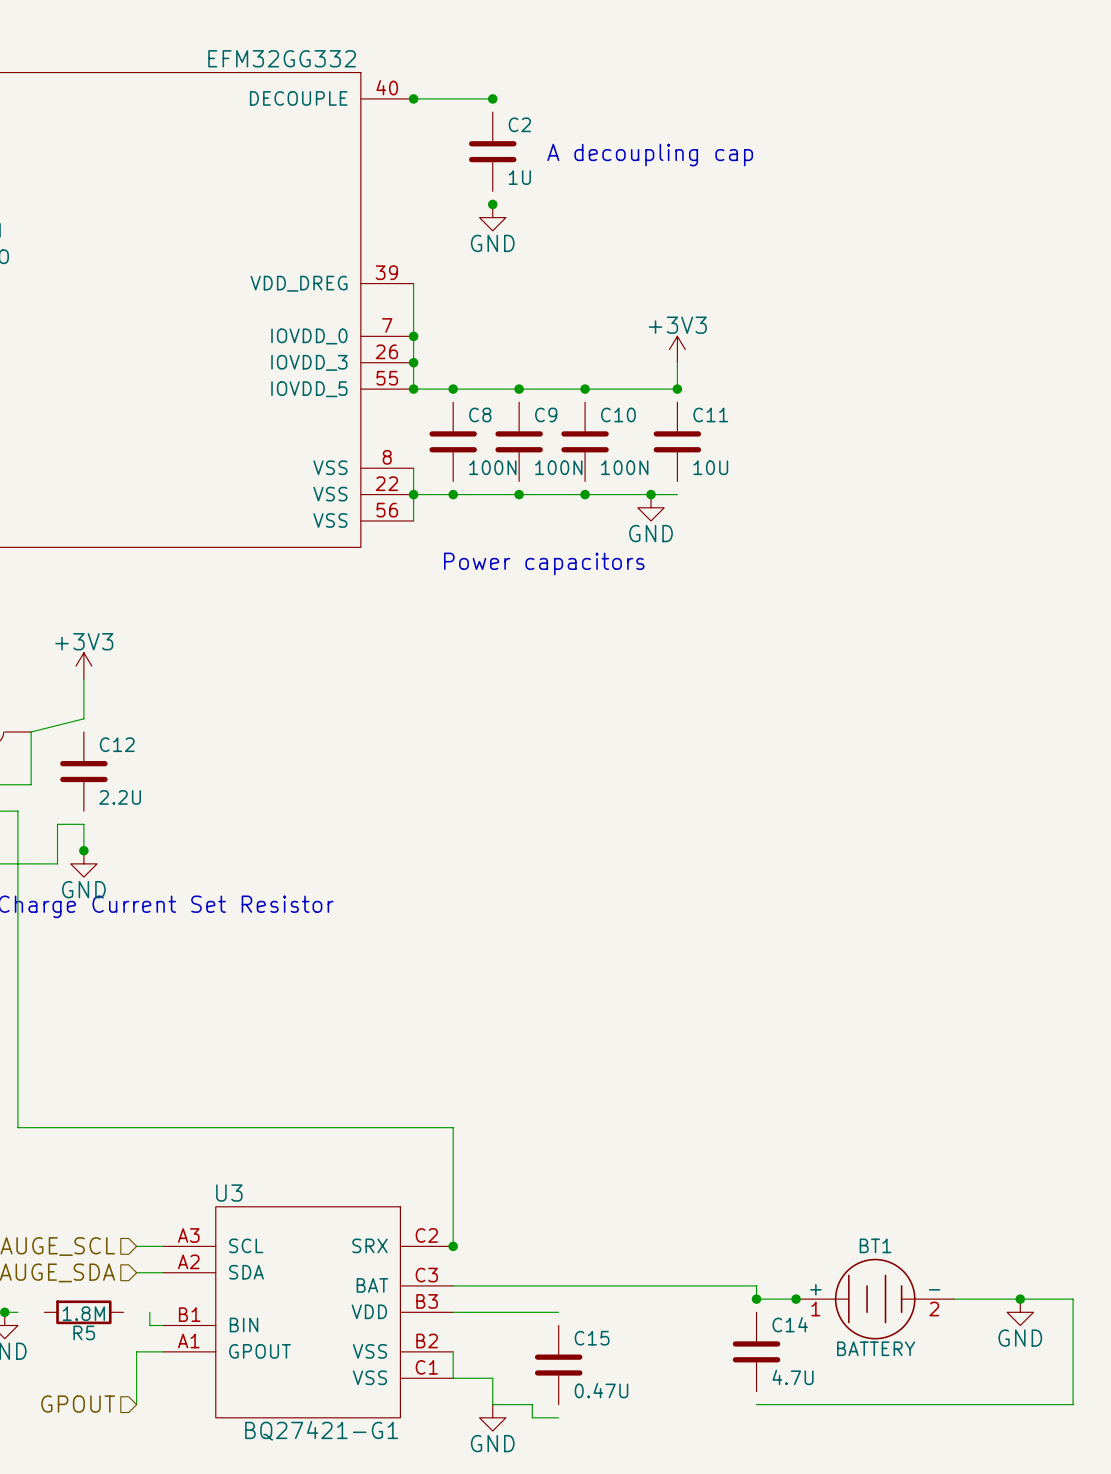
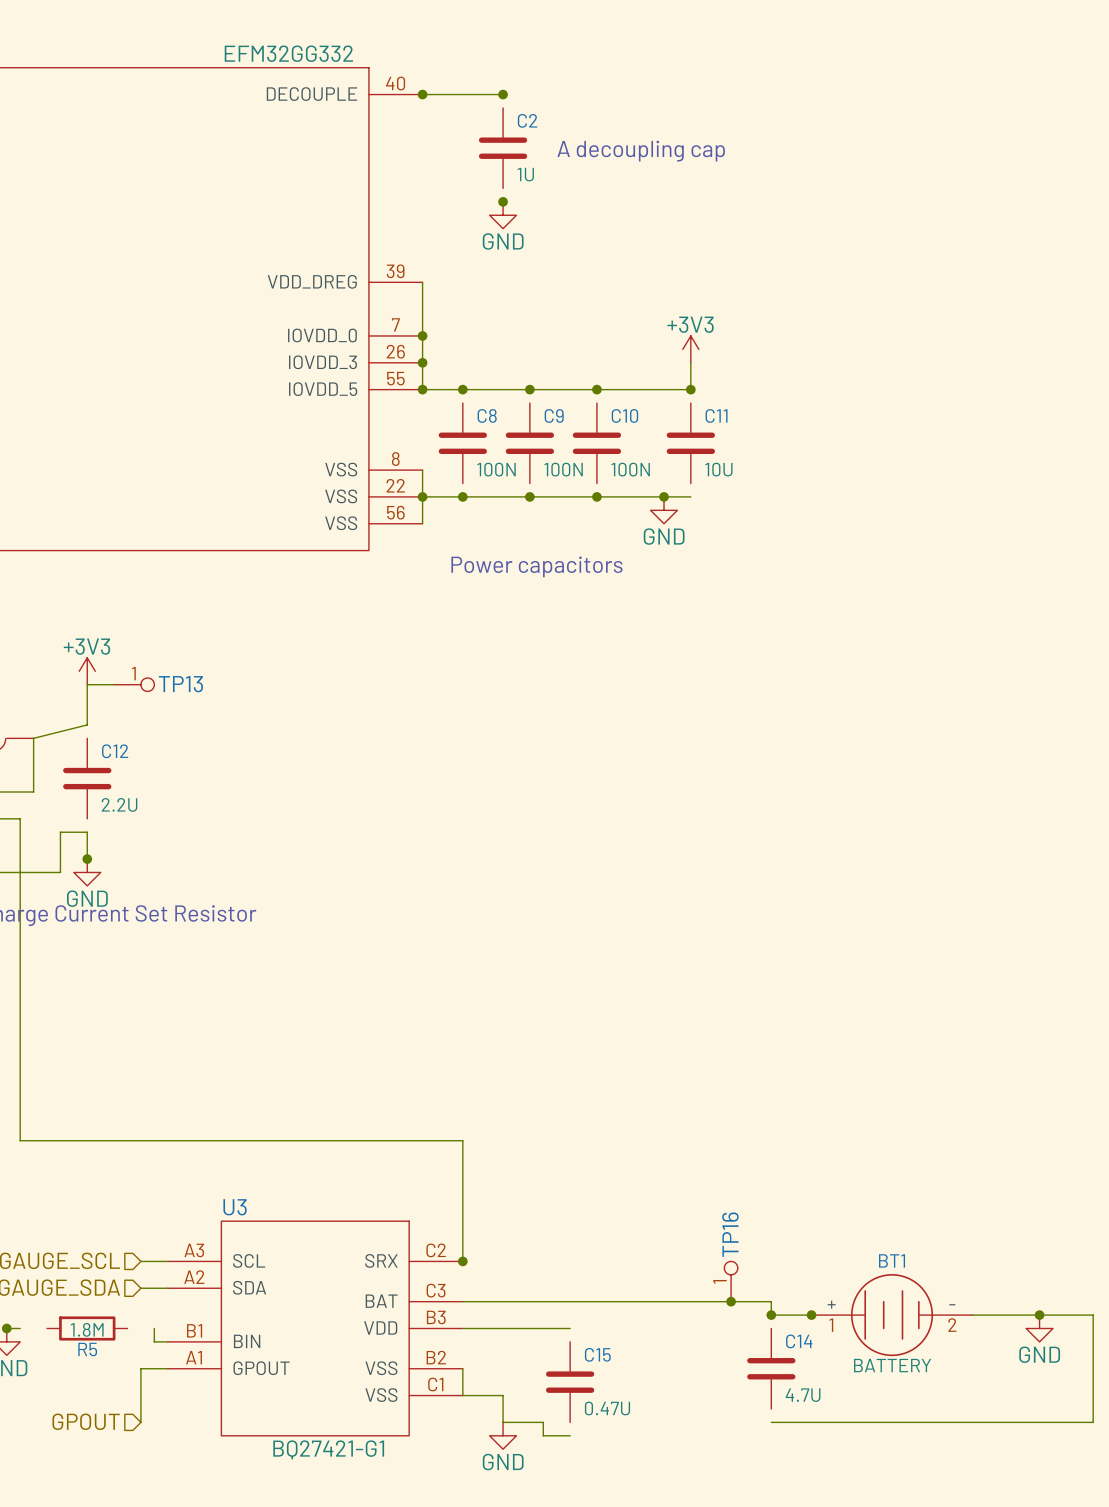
wire: none -> (87, 684) (114, 684)
TP13: none -> (134, 684)
TP16: none -> (731, 1281)
junction: none -> (731, 1301)

